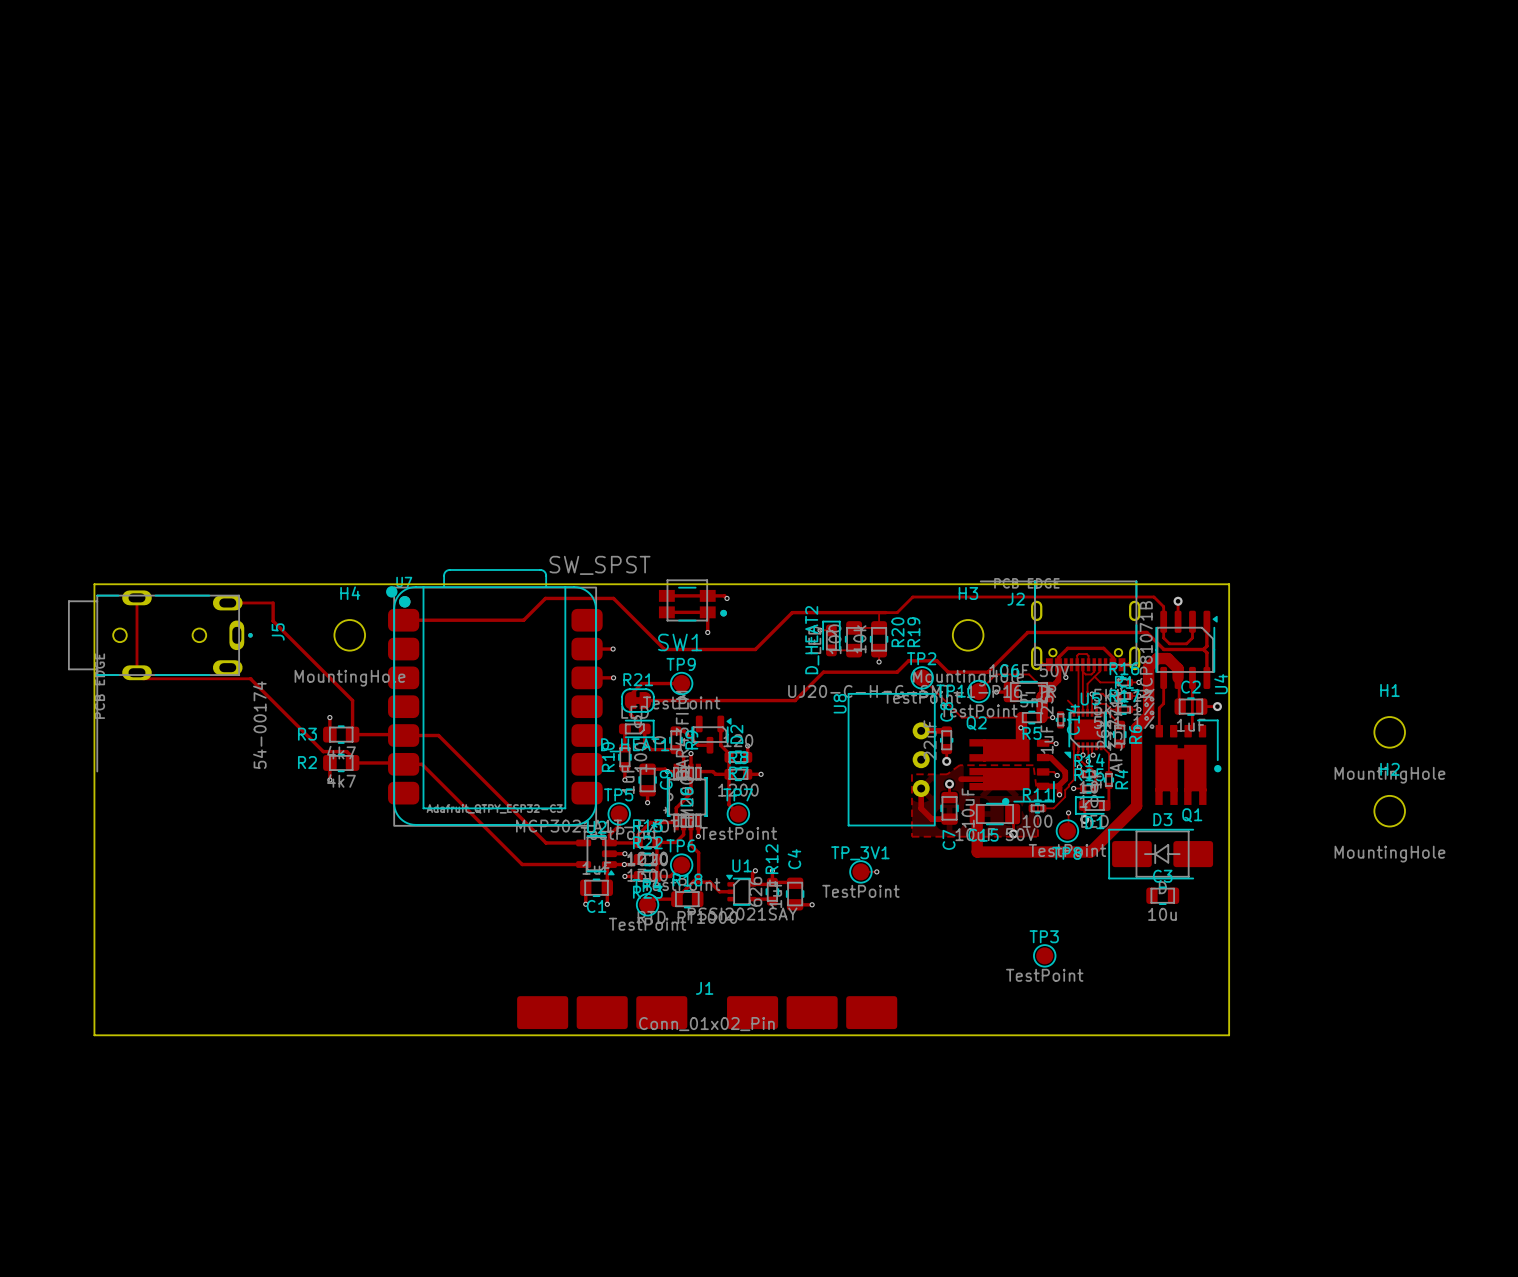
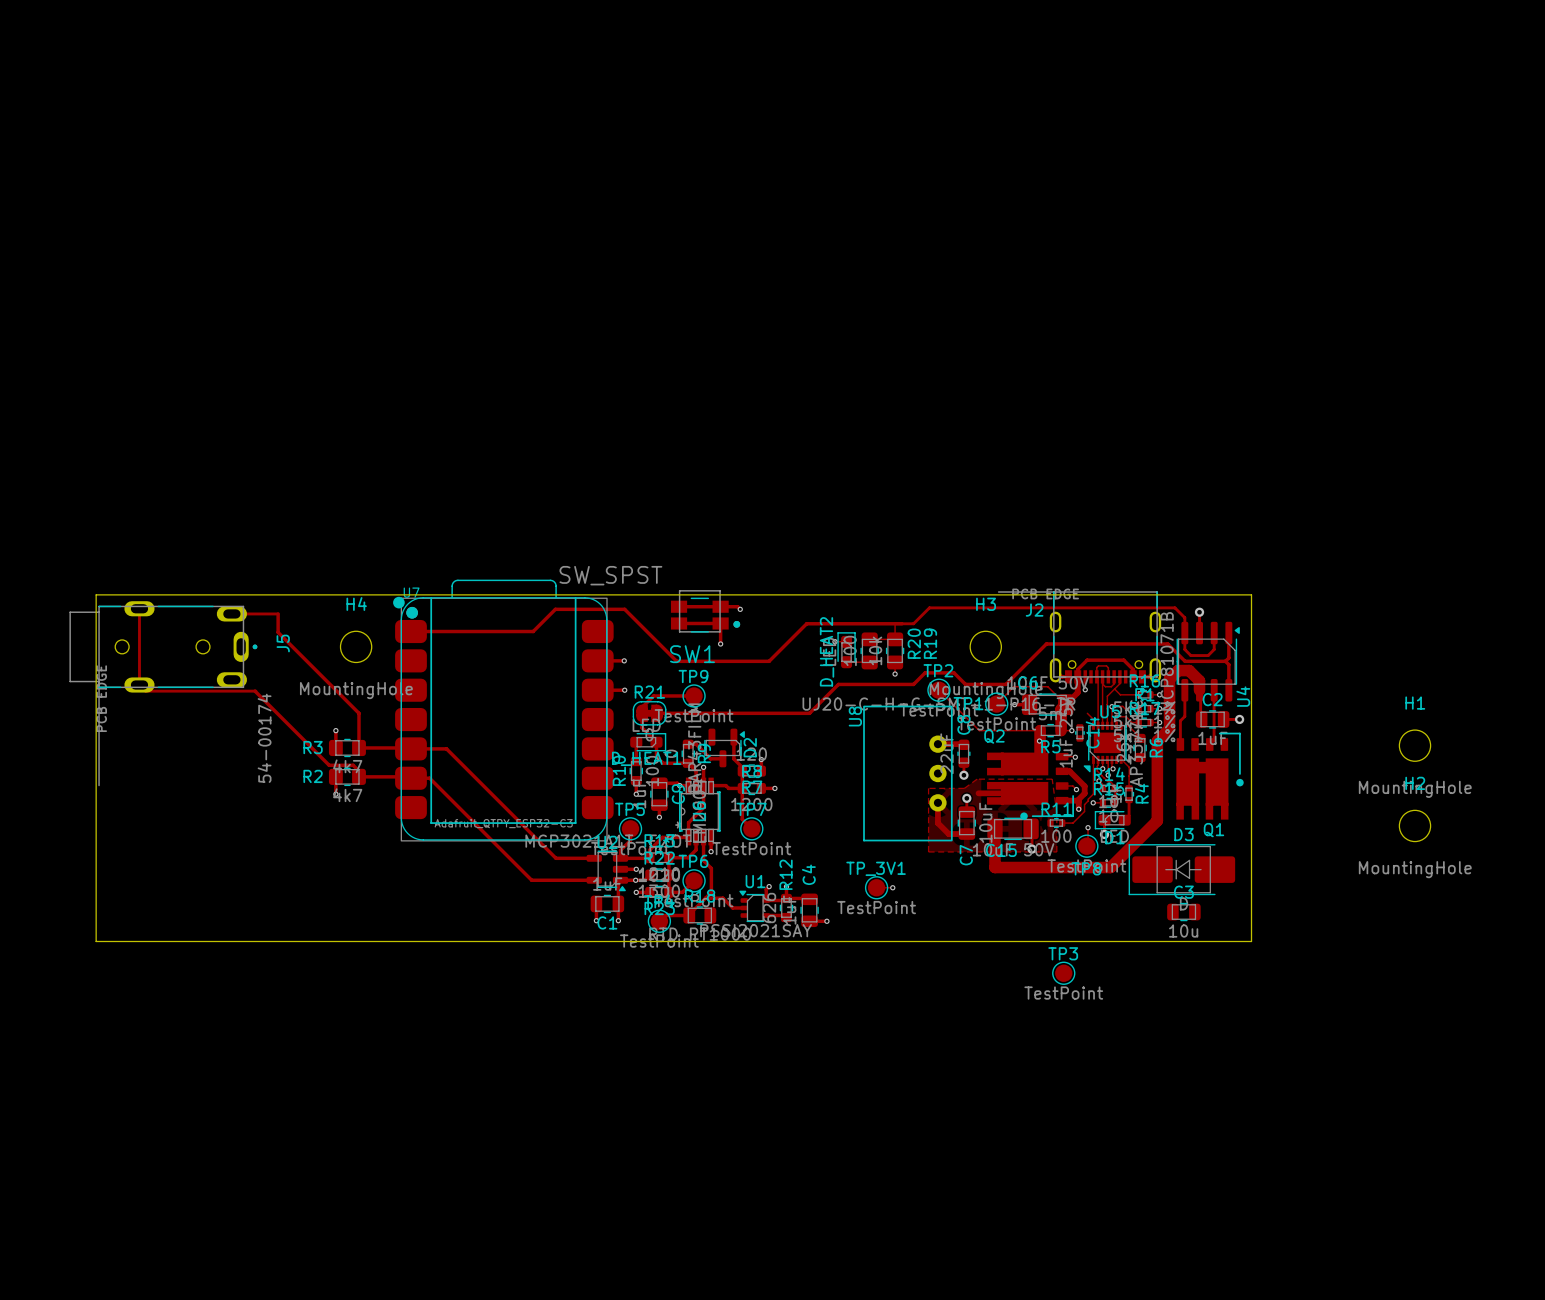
board edge: (94, 924) (94, 1035) (1229, 1035) (1229, 924) -> (96, 941) (1251, 941)
J1: Conn_01x02_Pin (707, 1012) -> none

